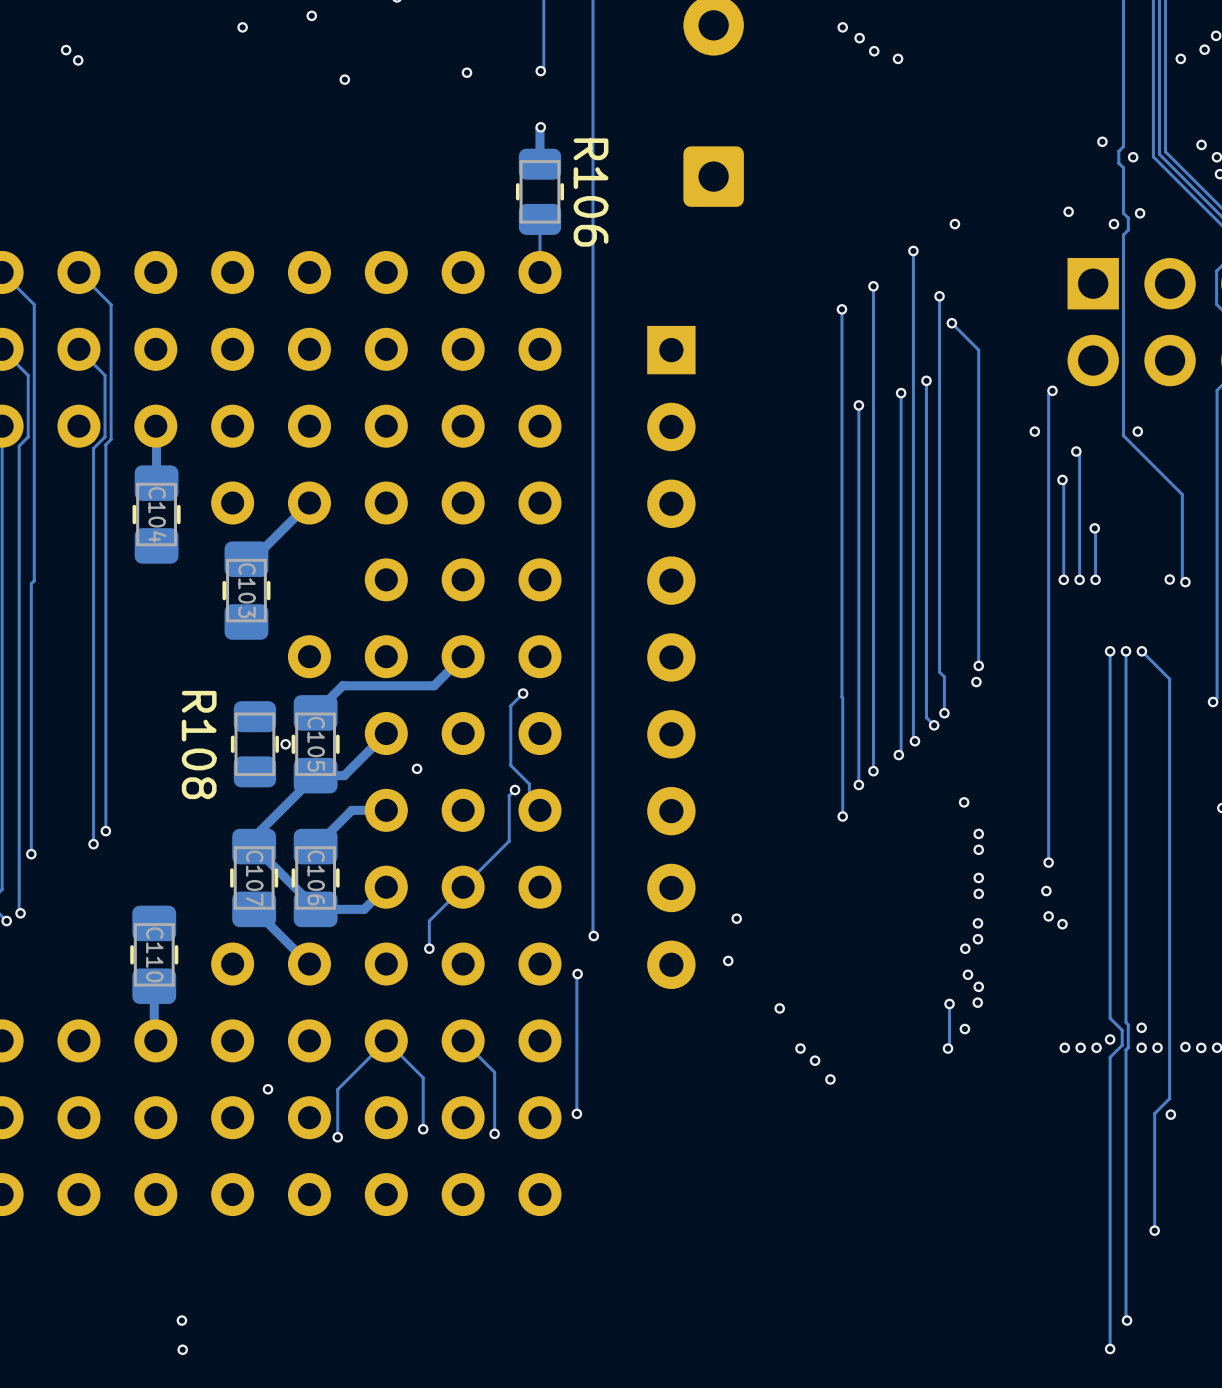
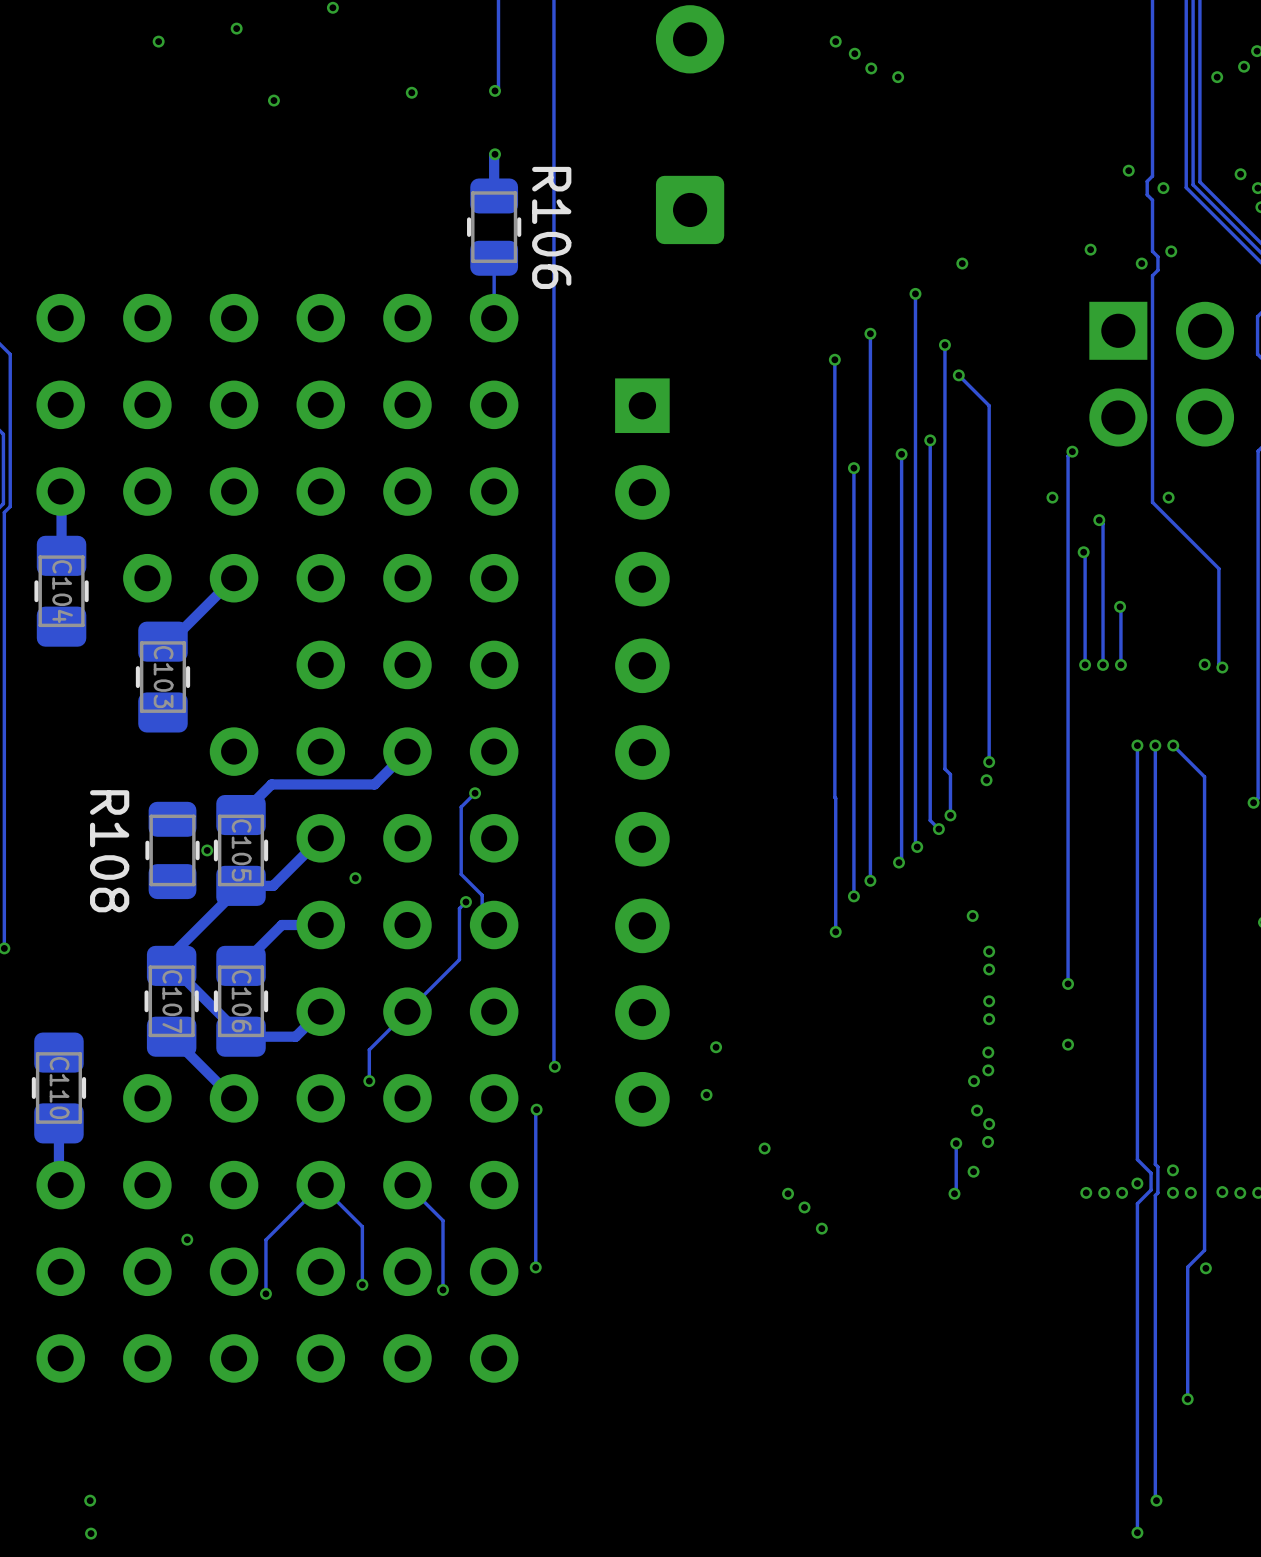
via: (1046, 891) -> none
via: (1062, 924) -> none

